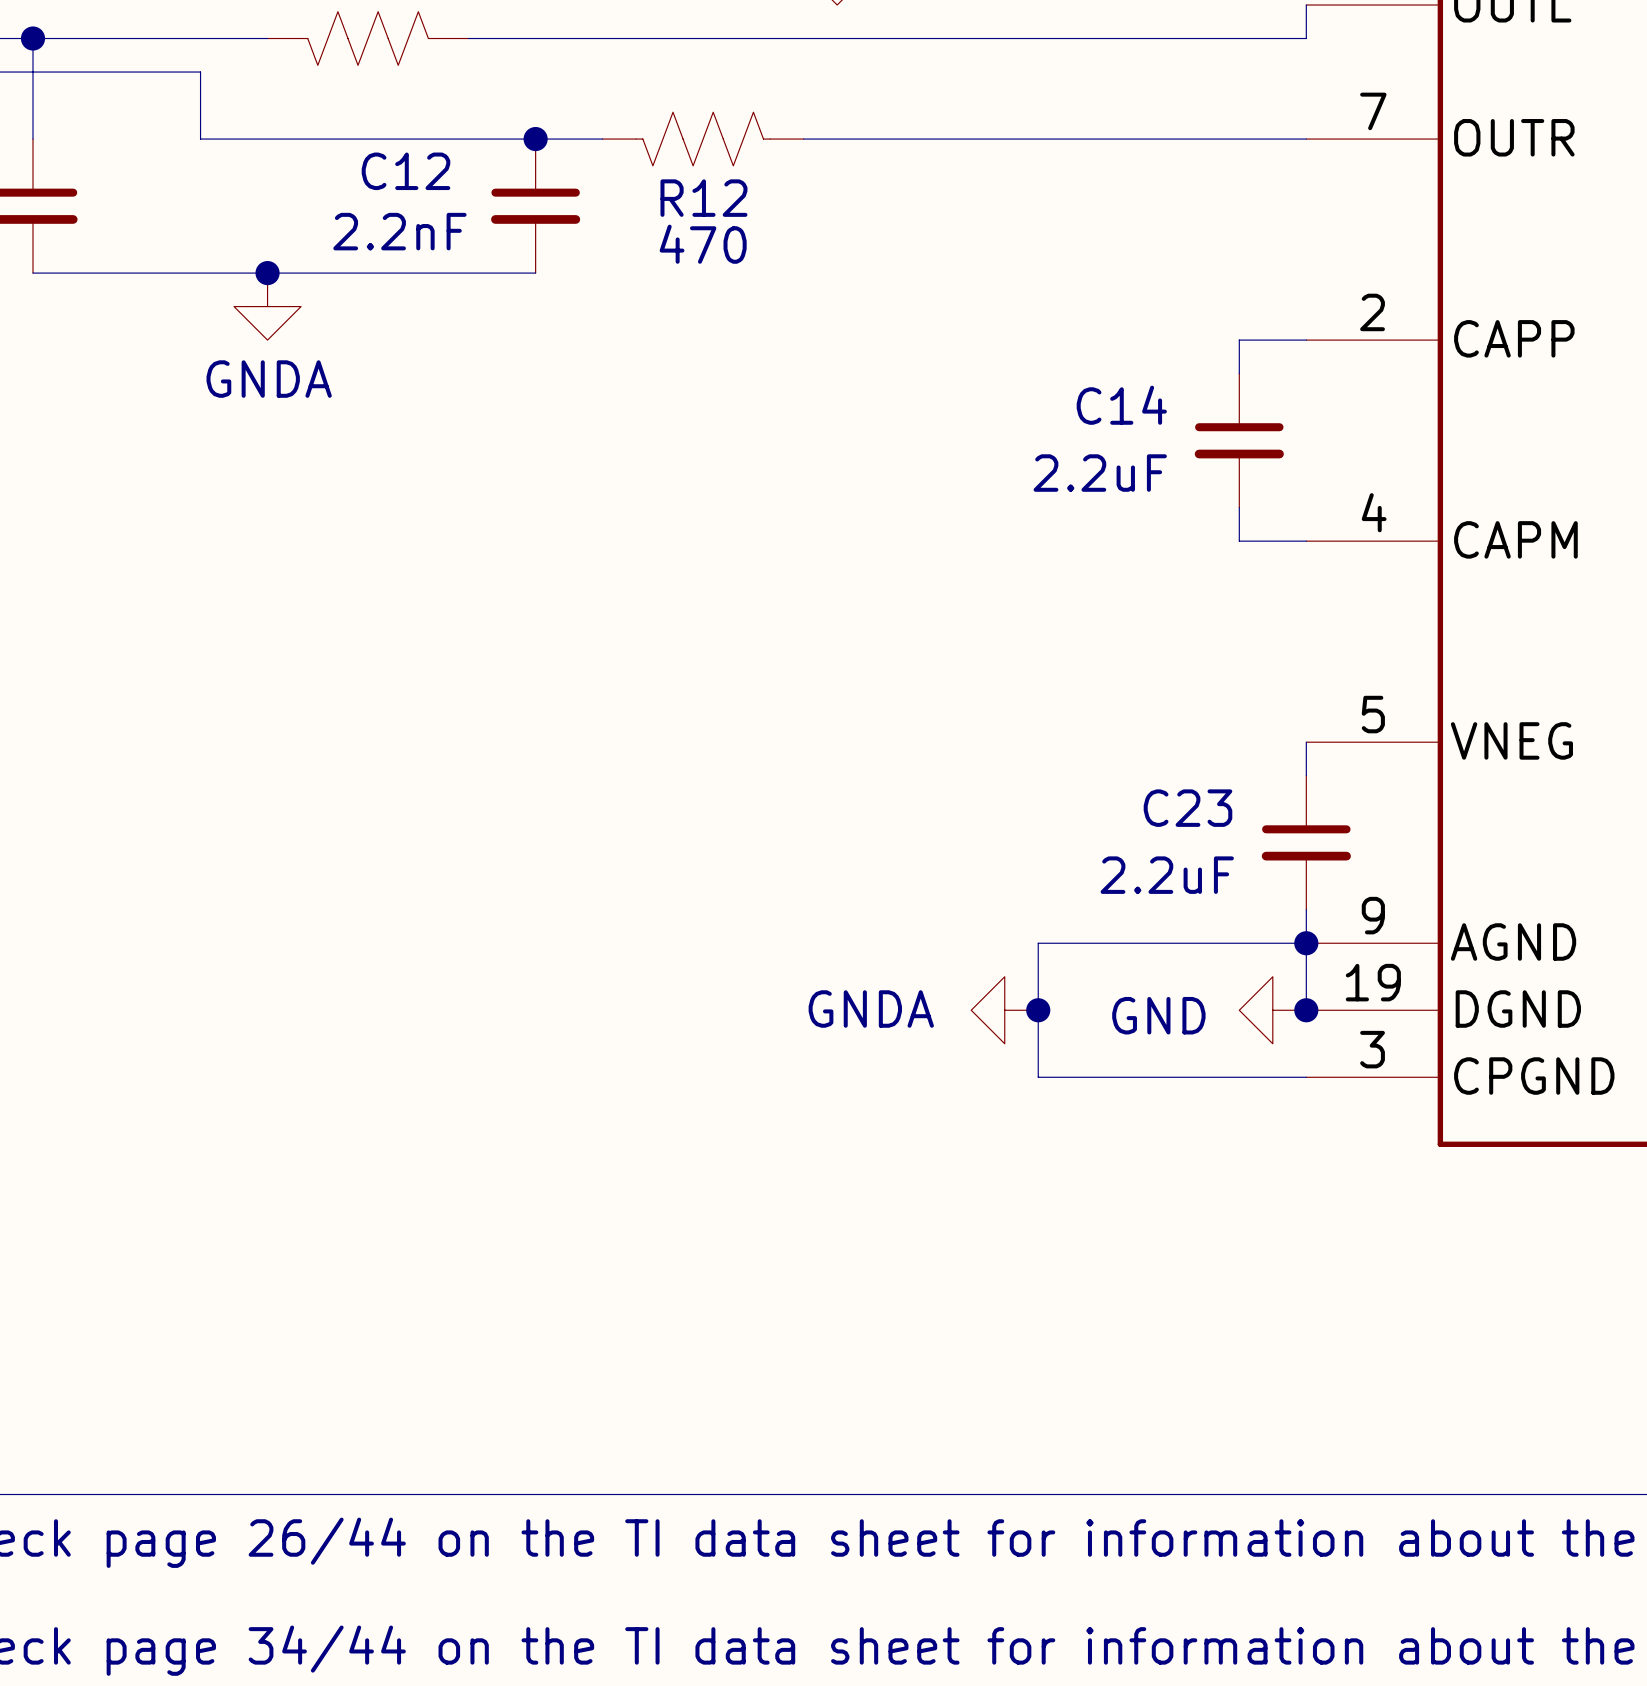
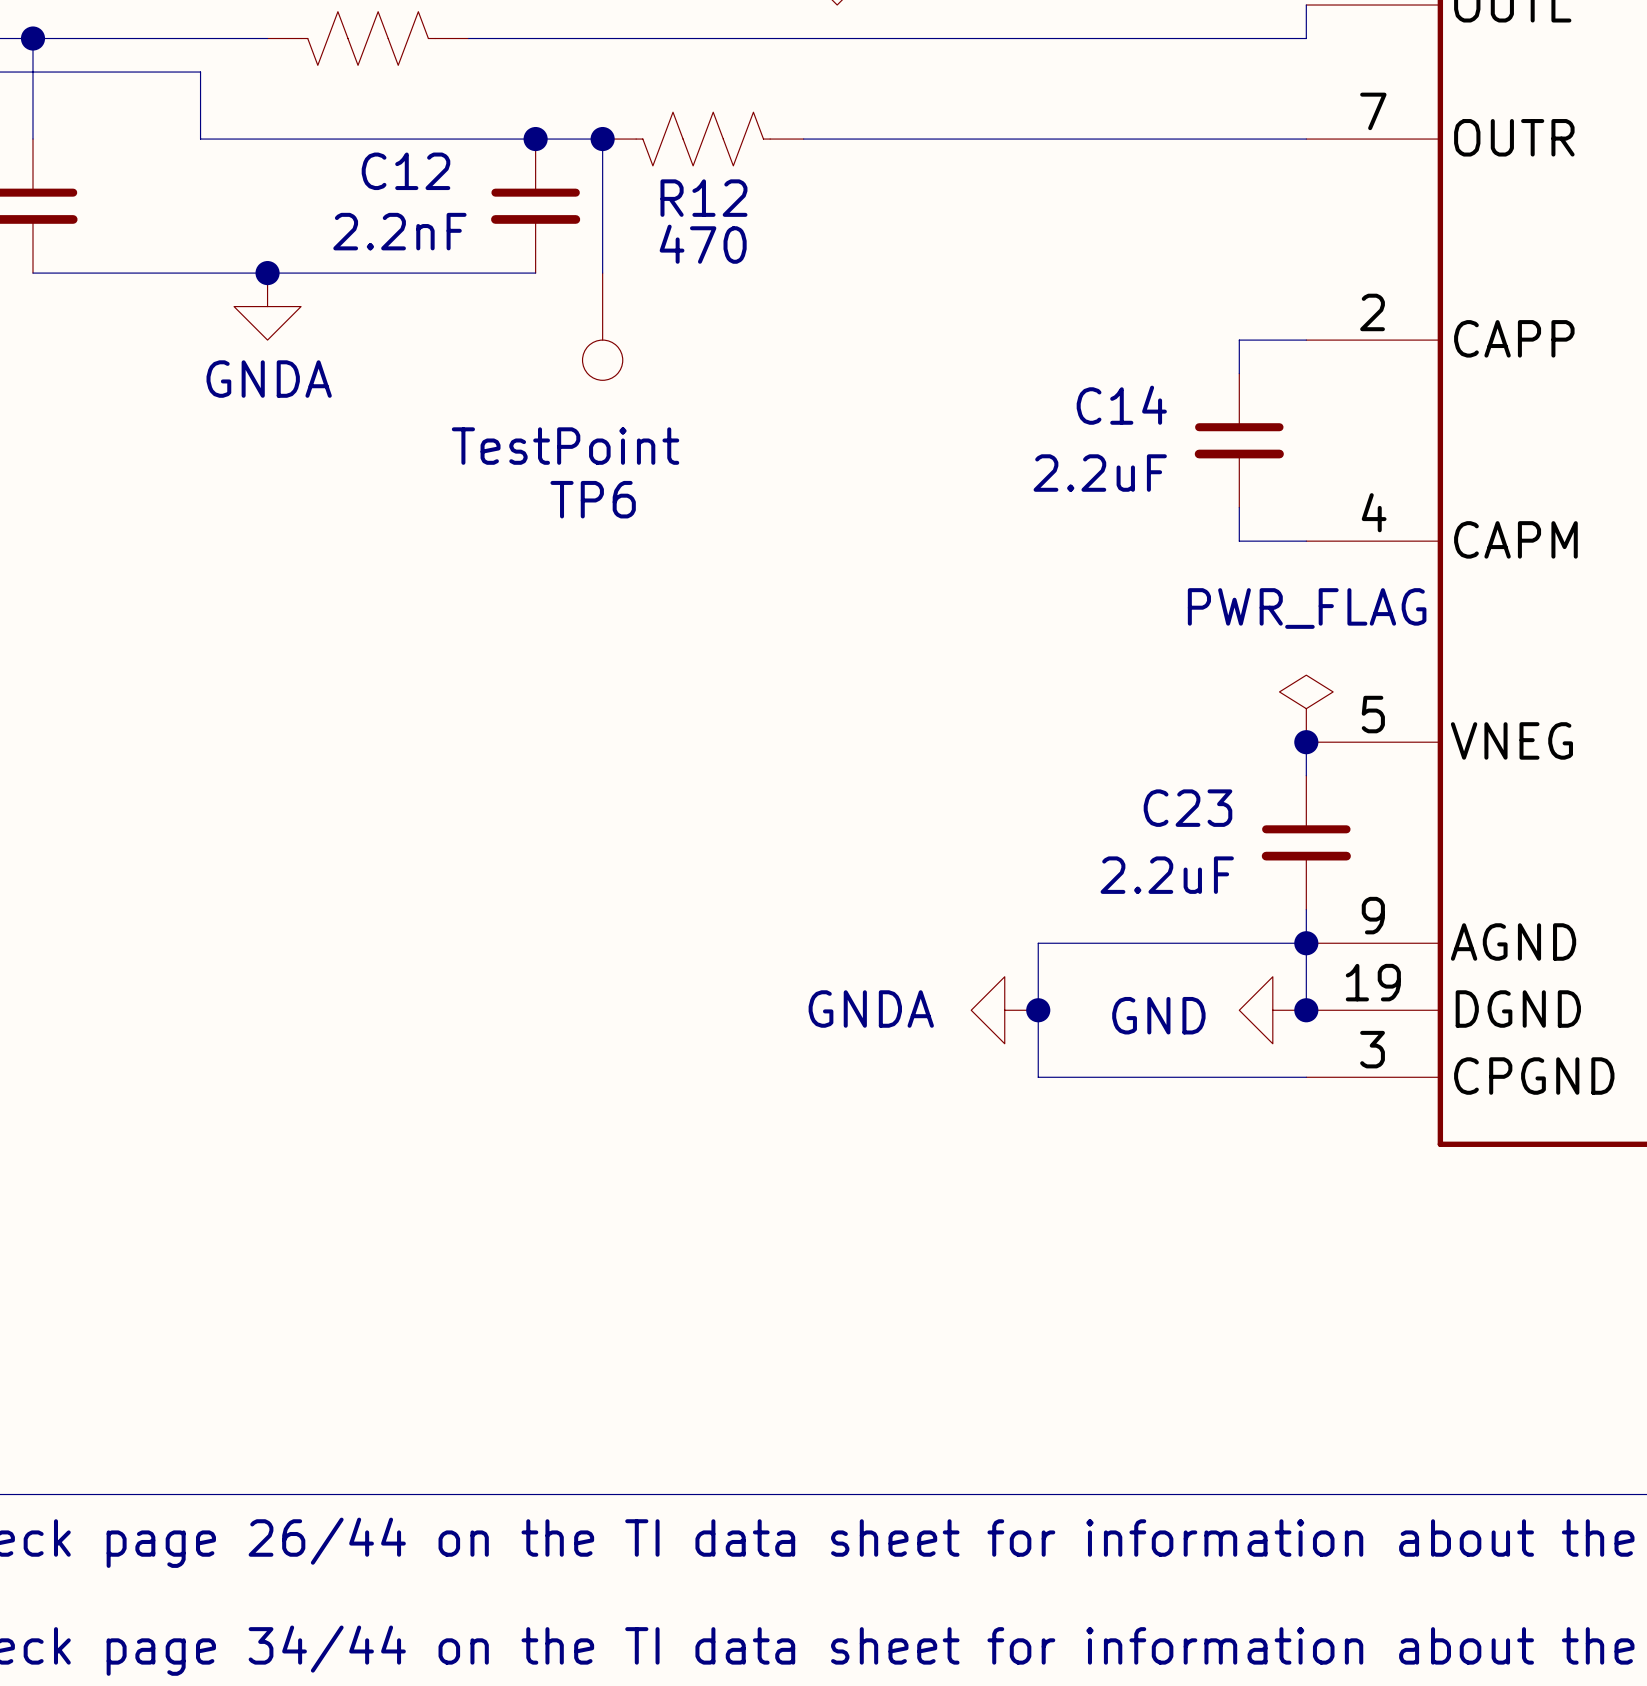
wire: none -> (602, 139) (602, 273)
junction: none -> (602, 139)
TP6: none -> TestPoint (602, 326)
power symbol: none -> PWR_FLAG (1306, 708)
junction: none -> (1306, 742)

